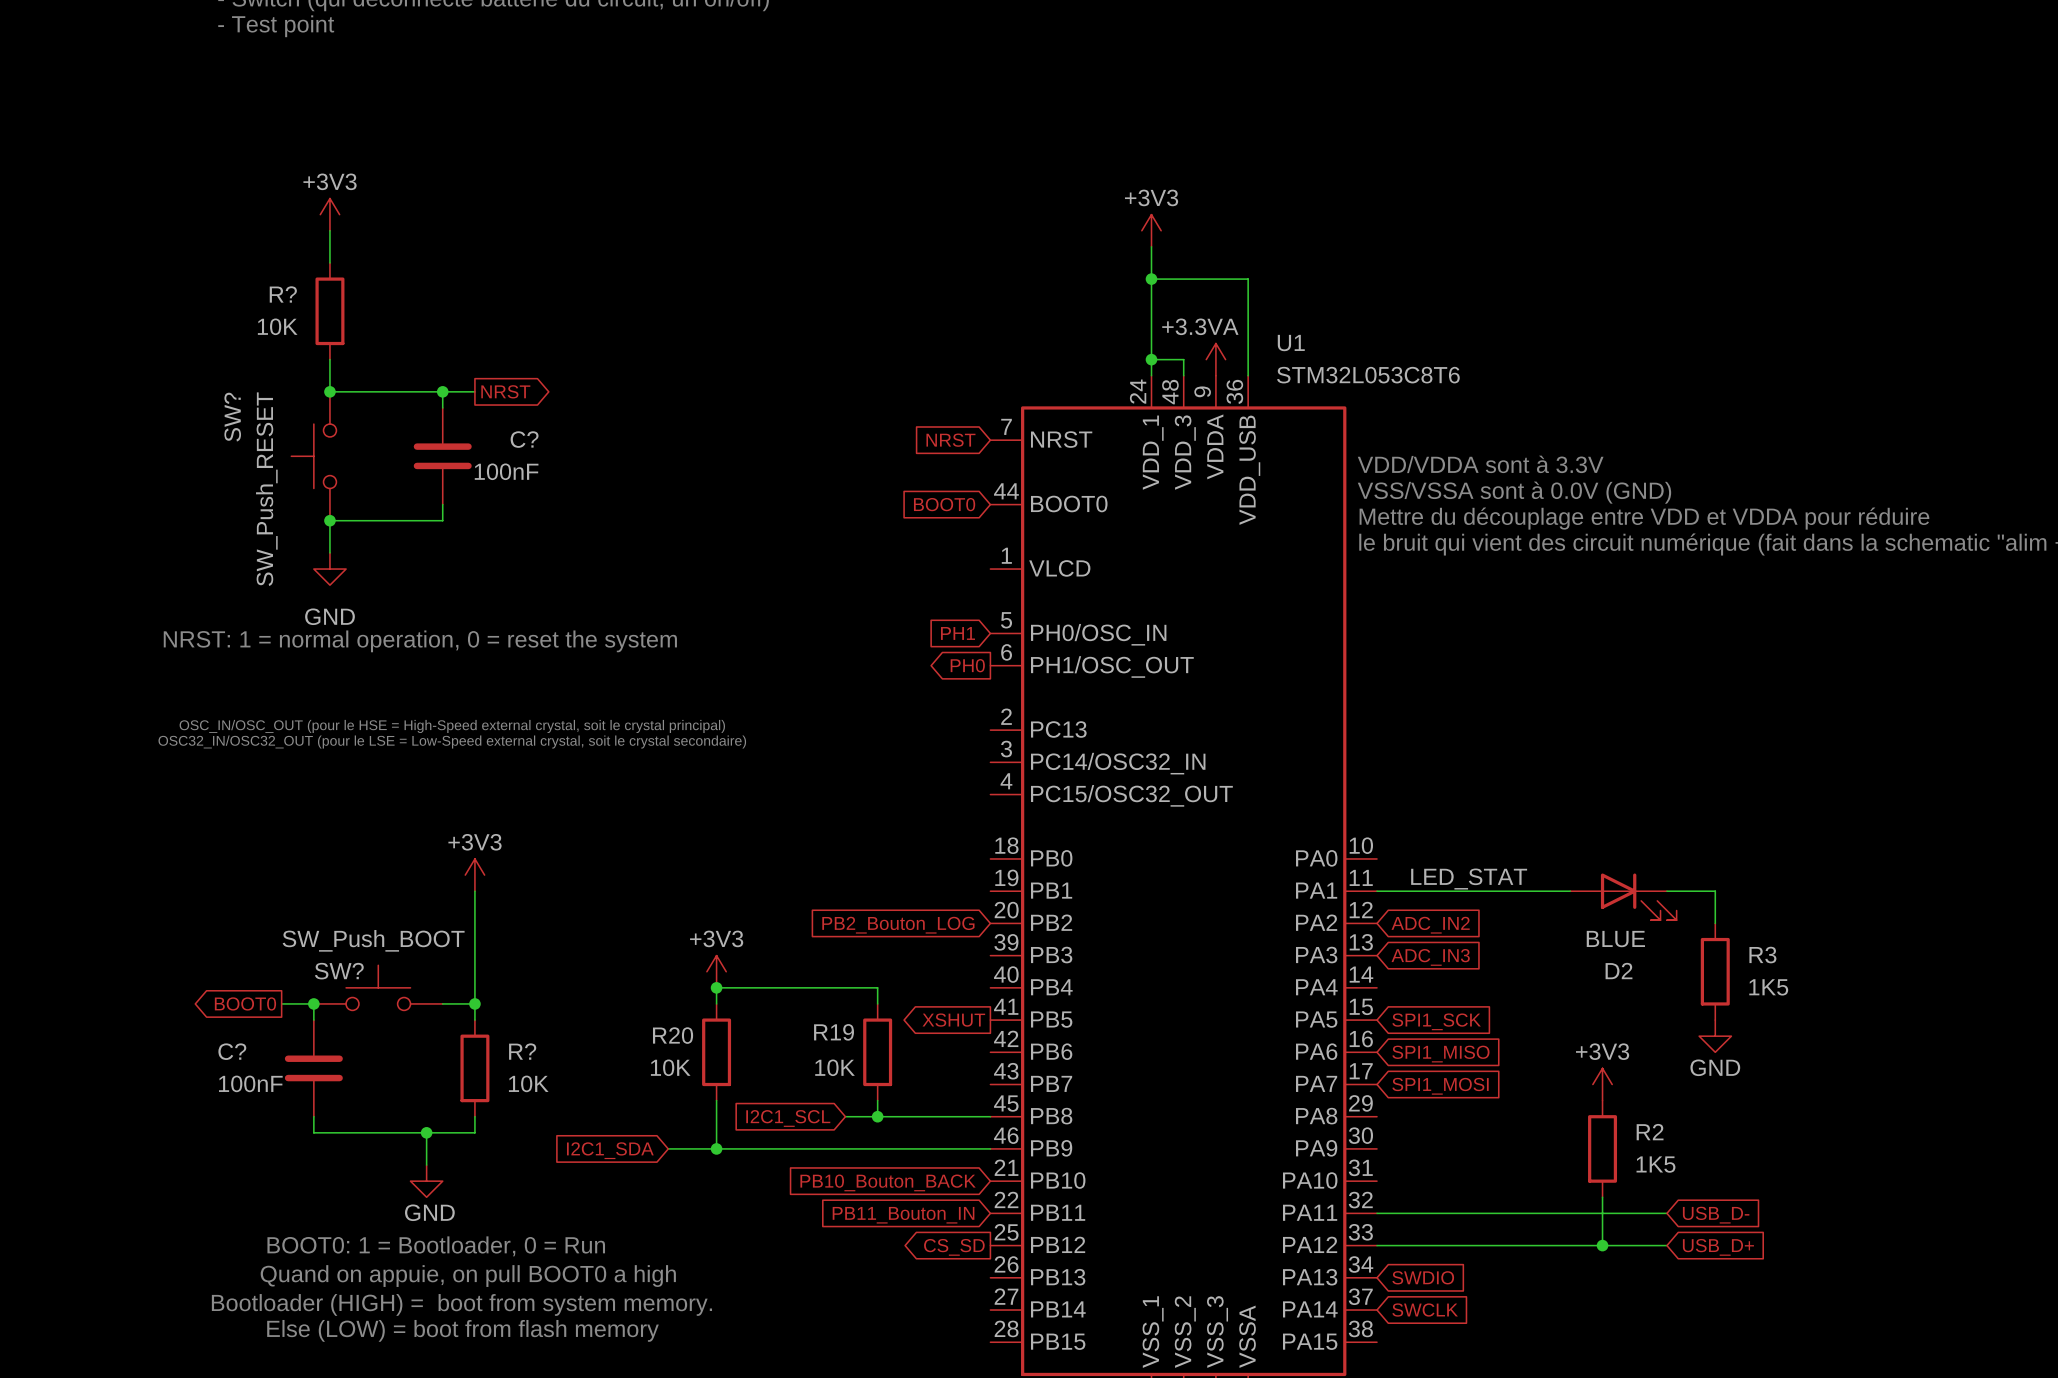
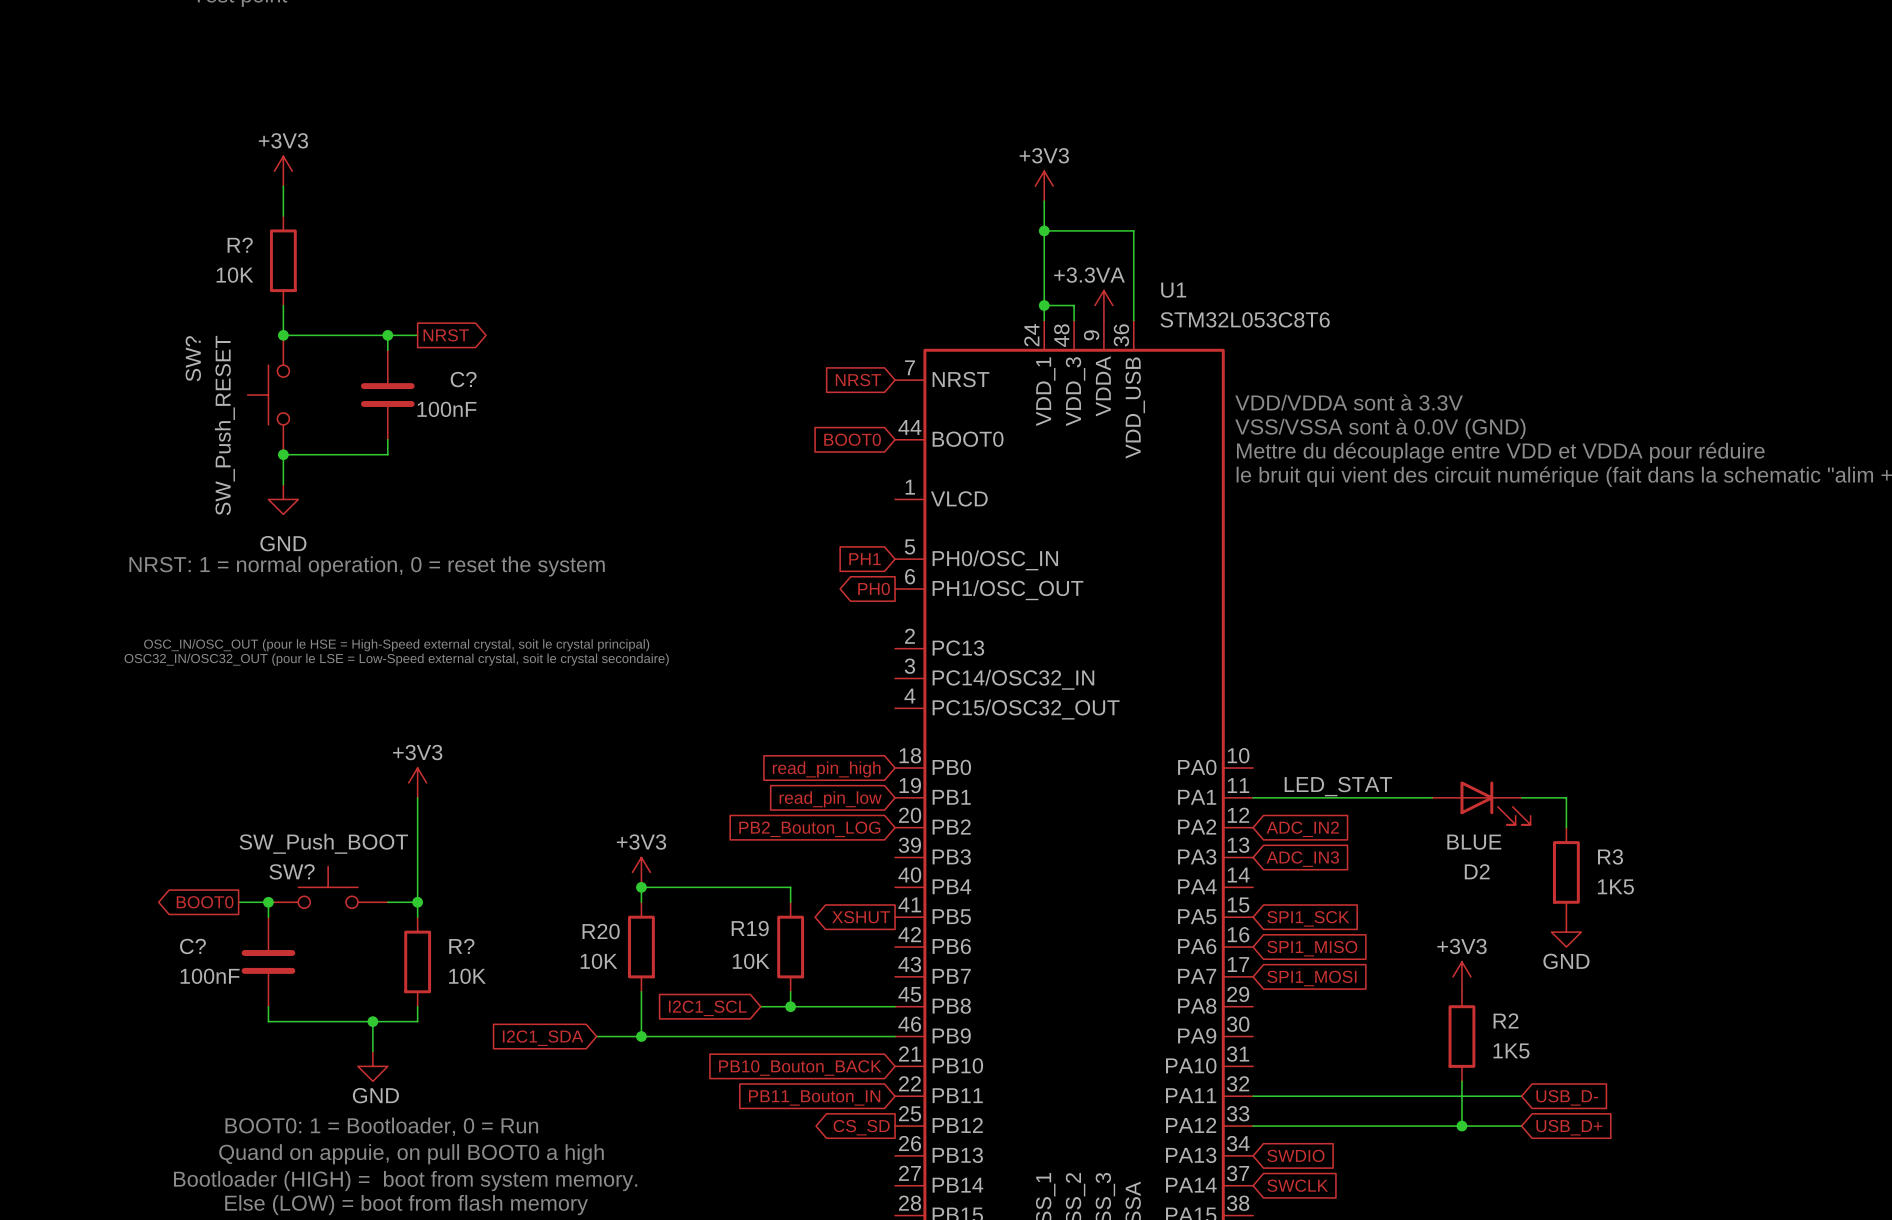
global label: none -> read_pin_high (826, 769)
global label: none -> read_pin_low (830, 799)

